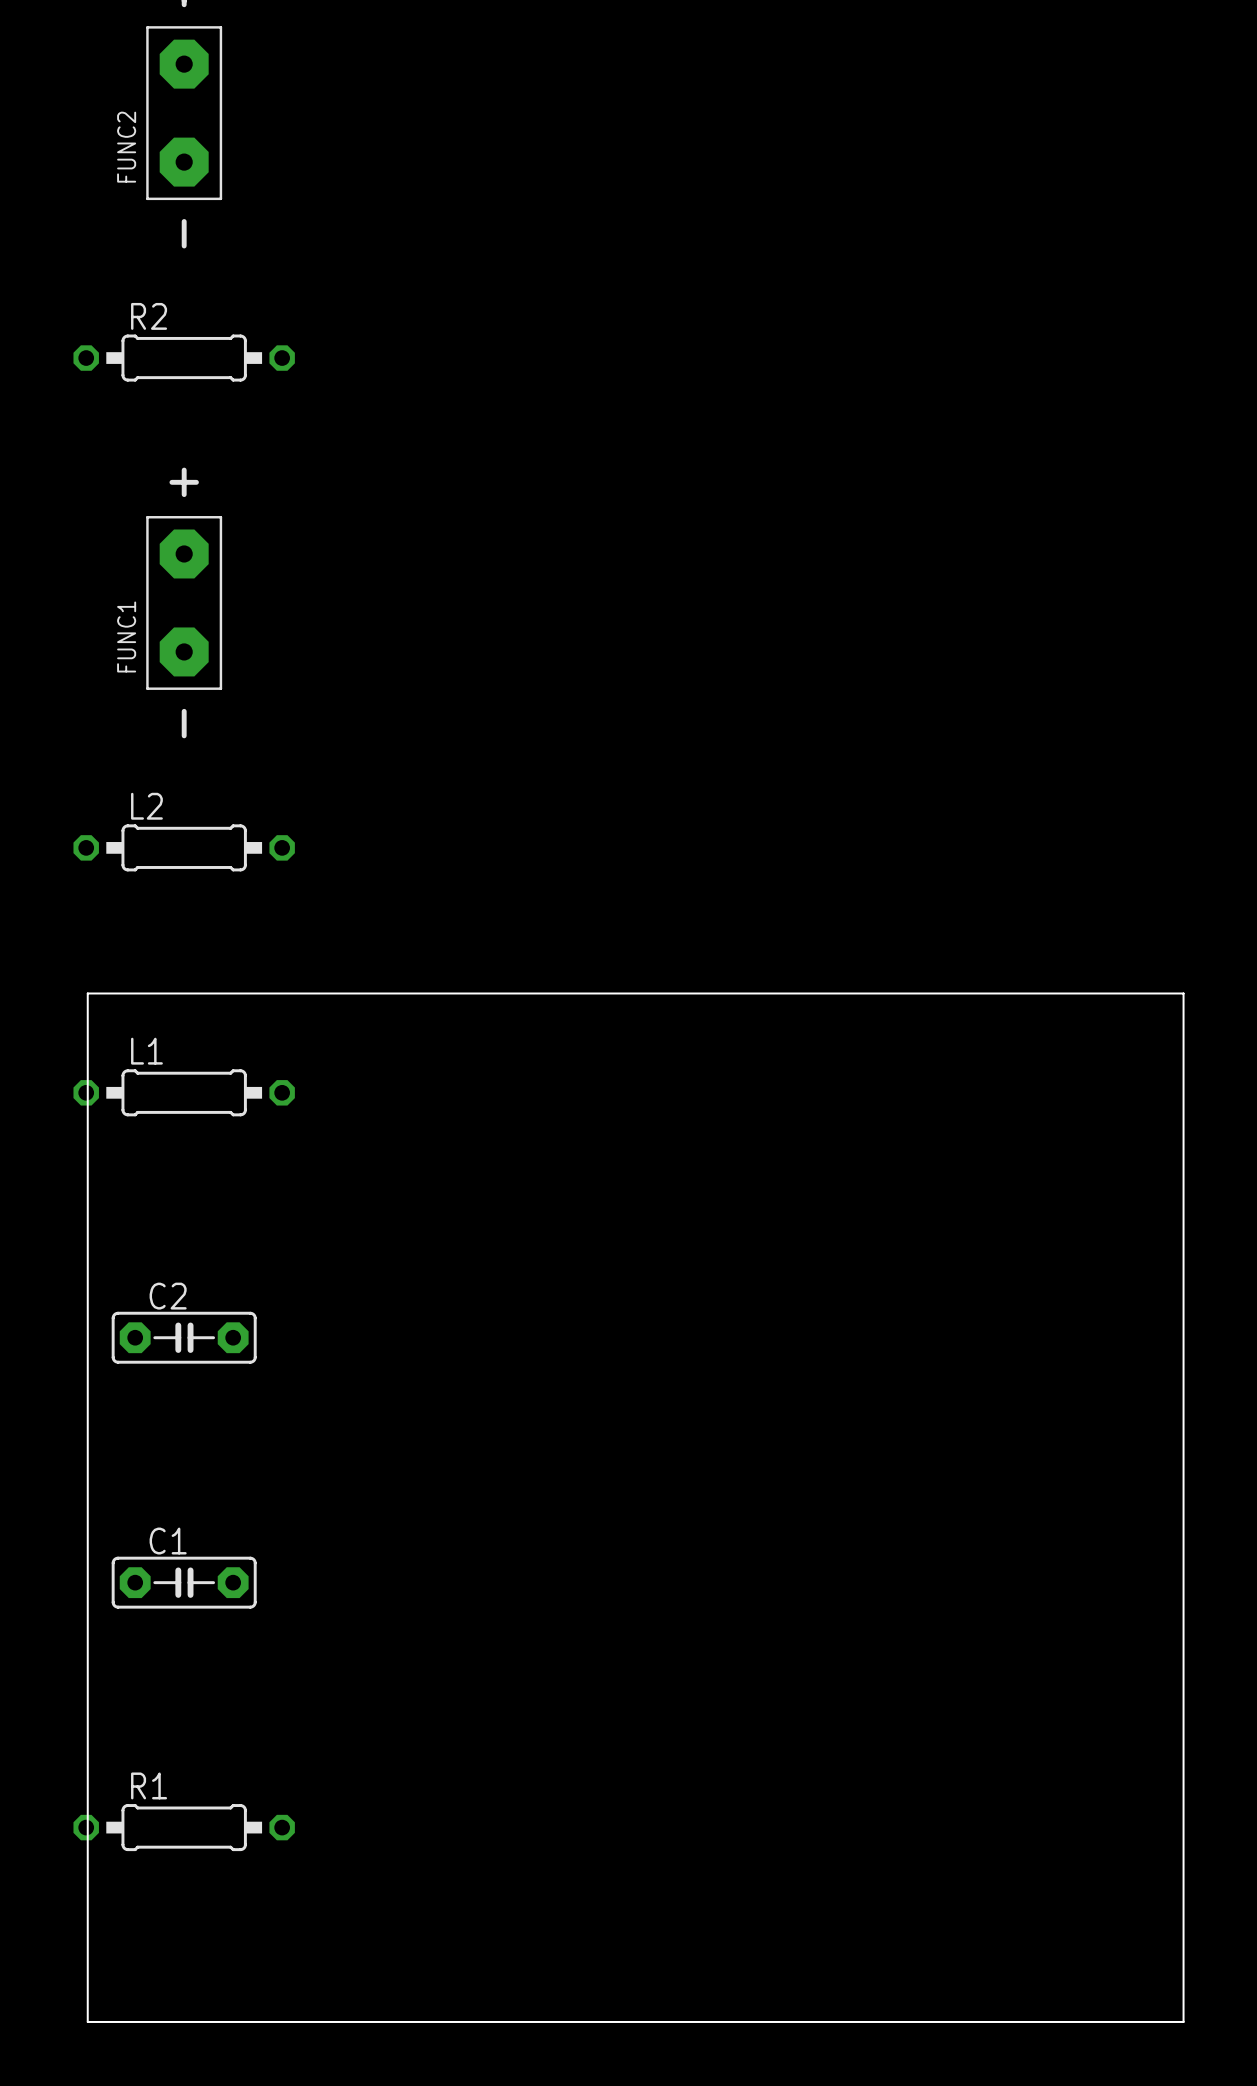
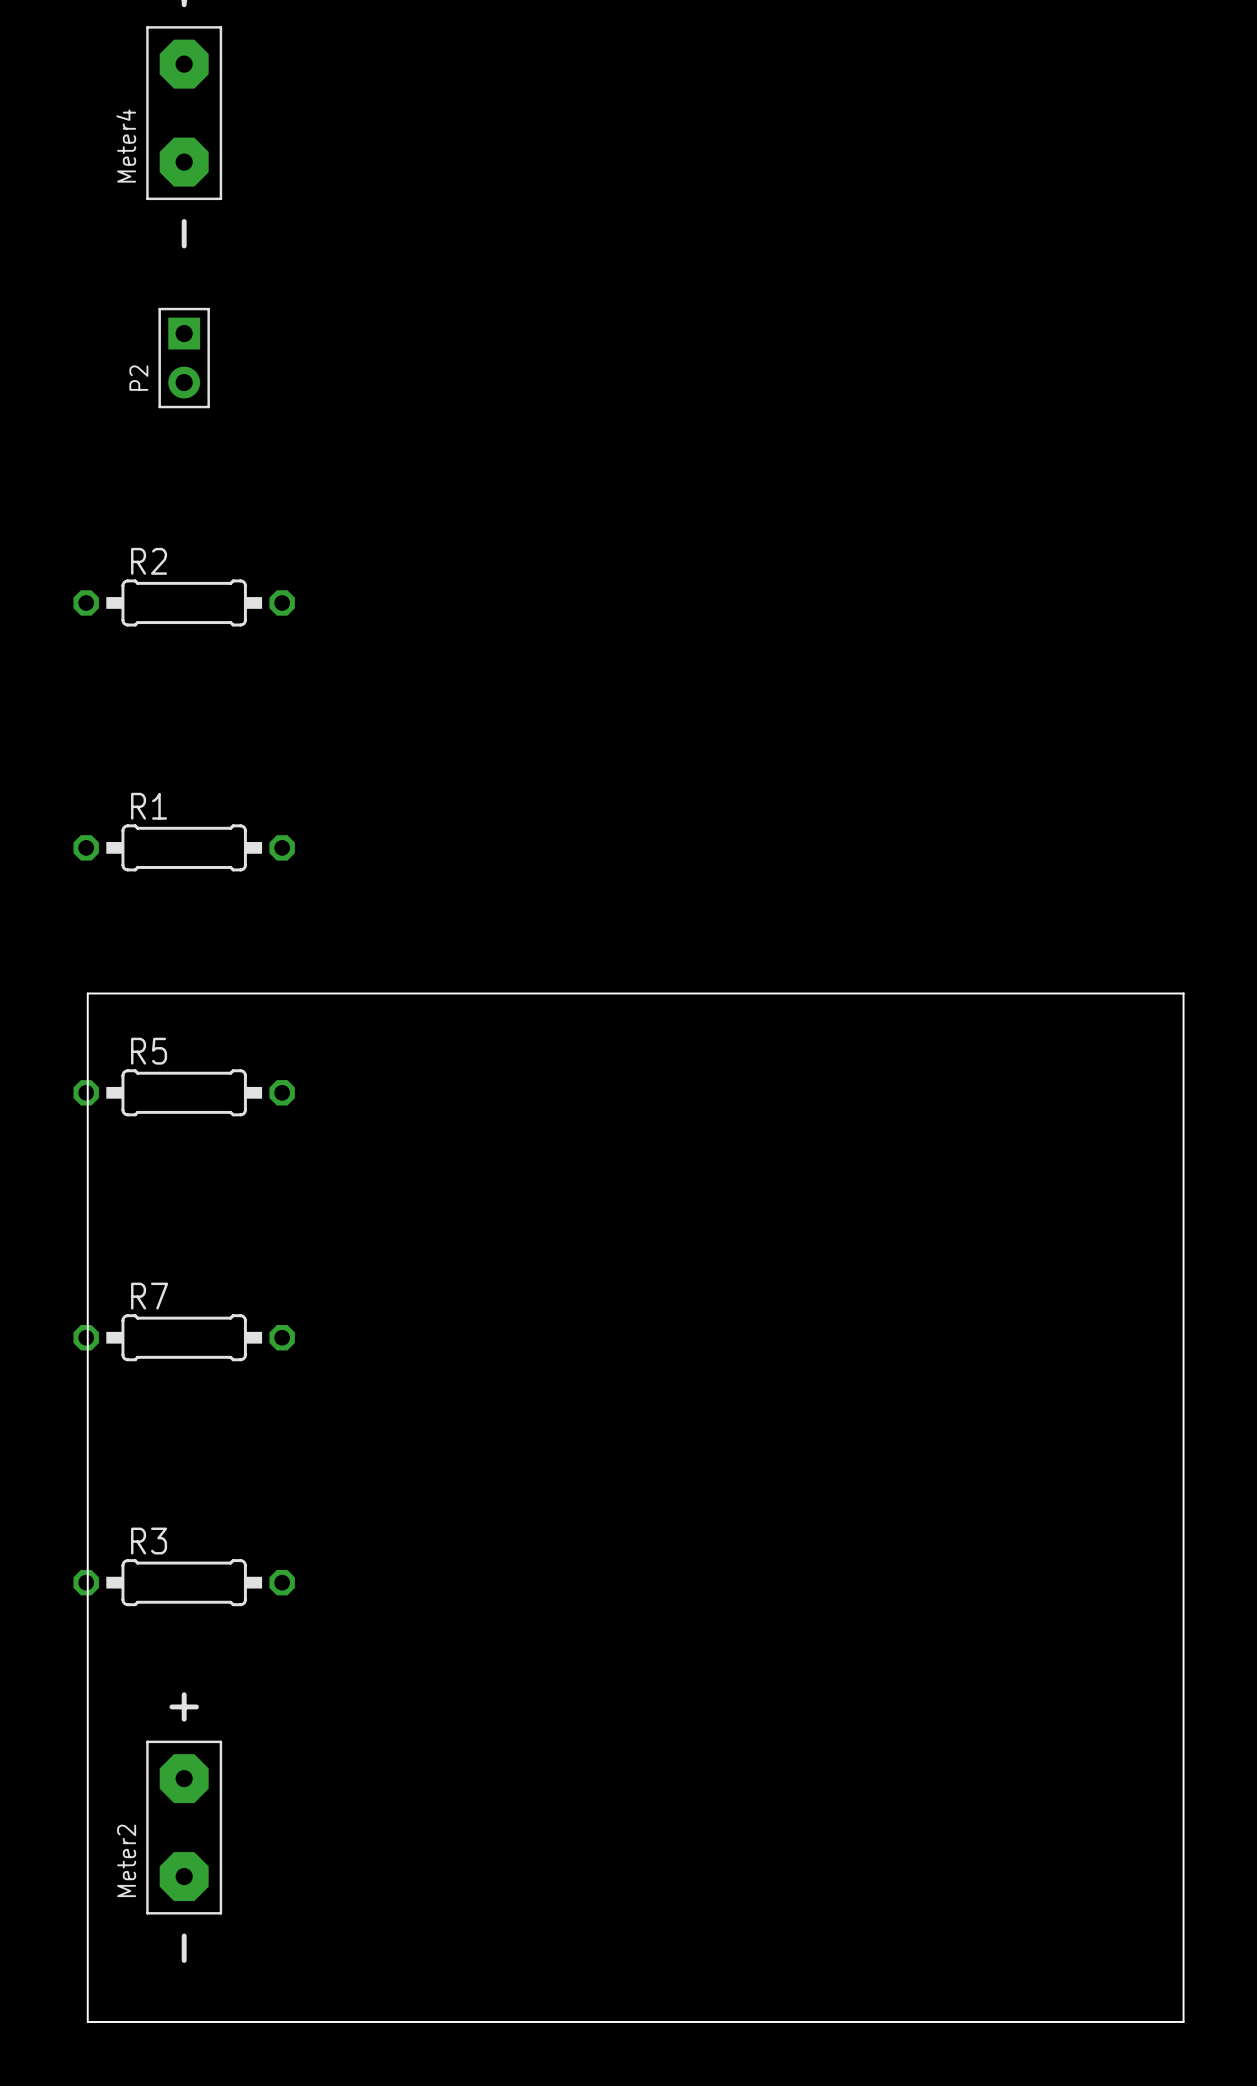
FUNC2 name: FUNC2 (126, 147) -> Meter4 (126, 146)
R2 position: (184, 358) -> (184, 602)
P2: none -> (184, 358)
FUNC1: (184, 602) -> none
L2 name: L2 (146, 806) -> R1 (149, 806)
L1 name: L1 (146, 1051) -> R5 (149, 1051)
C2: (184, 1337) -> none
R7: none -> (184, 1337)
C1: (184, 1582) -> none
R3: none -> (184, 1582)
R1: (184, 1827) -> none
Meter2: none -> (184, 1827)

